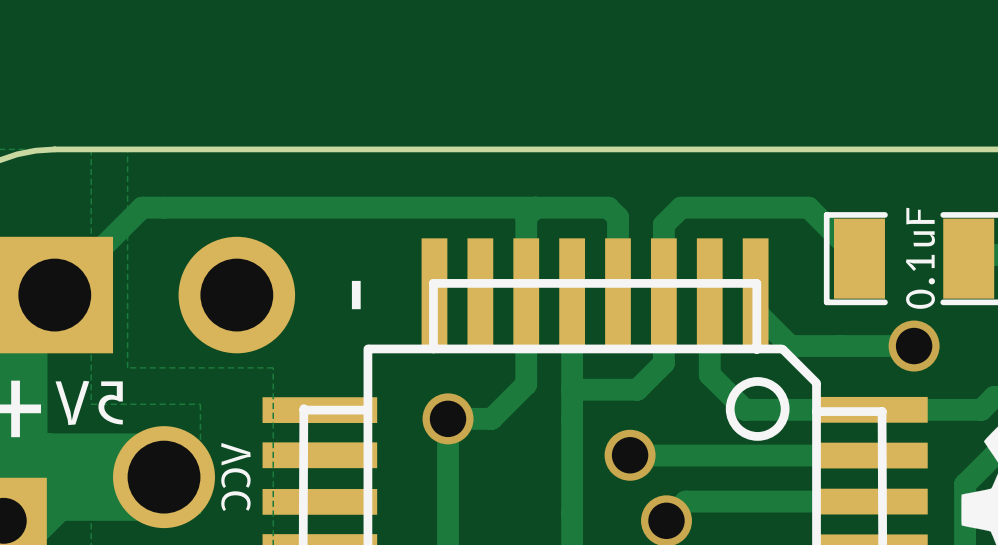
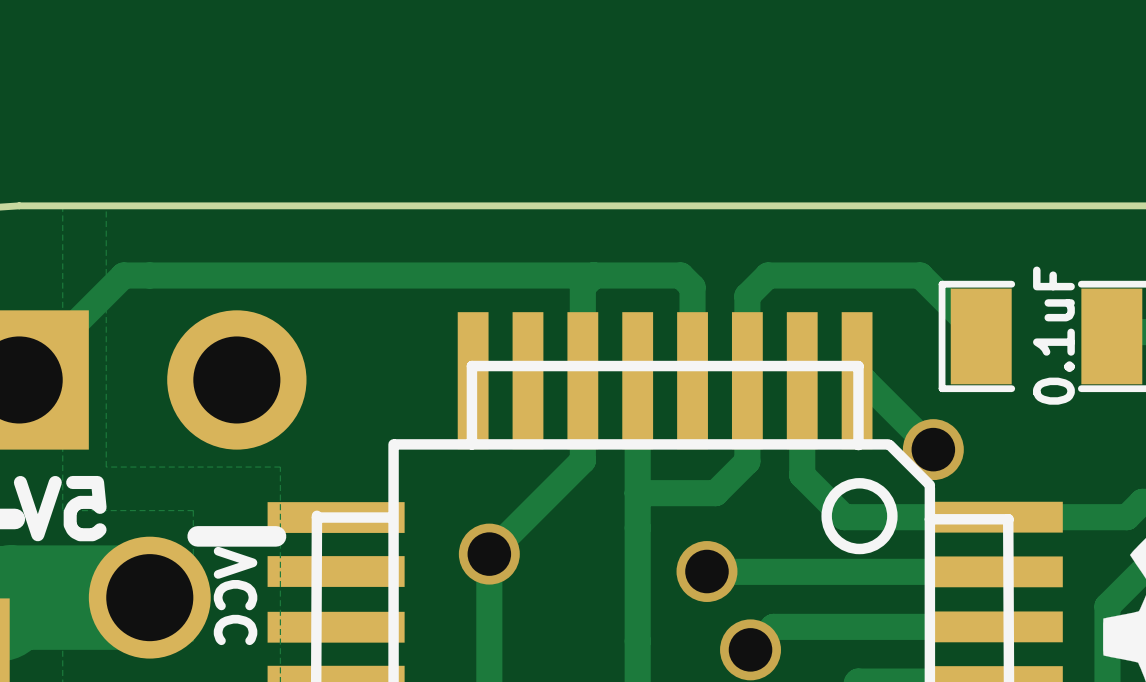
text rotation: 0° (356, 295) -> 90° clockwise (236, 536)
track: (755, 295) (755, 311) (790, 346) (914, 346) -> (857, 380) (864, 380) (933, 449)
via position: (914, 346) -> (933, 449)
track: (526, 362) (526, 384) (491, 418) (448, 418) (448, 440) -> (582, 460) (489, 554)
via position: (448, 418) -> (489, 554)

